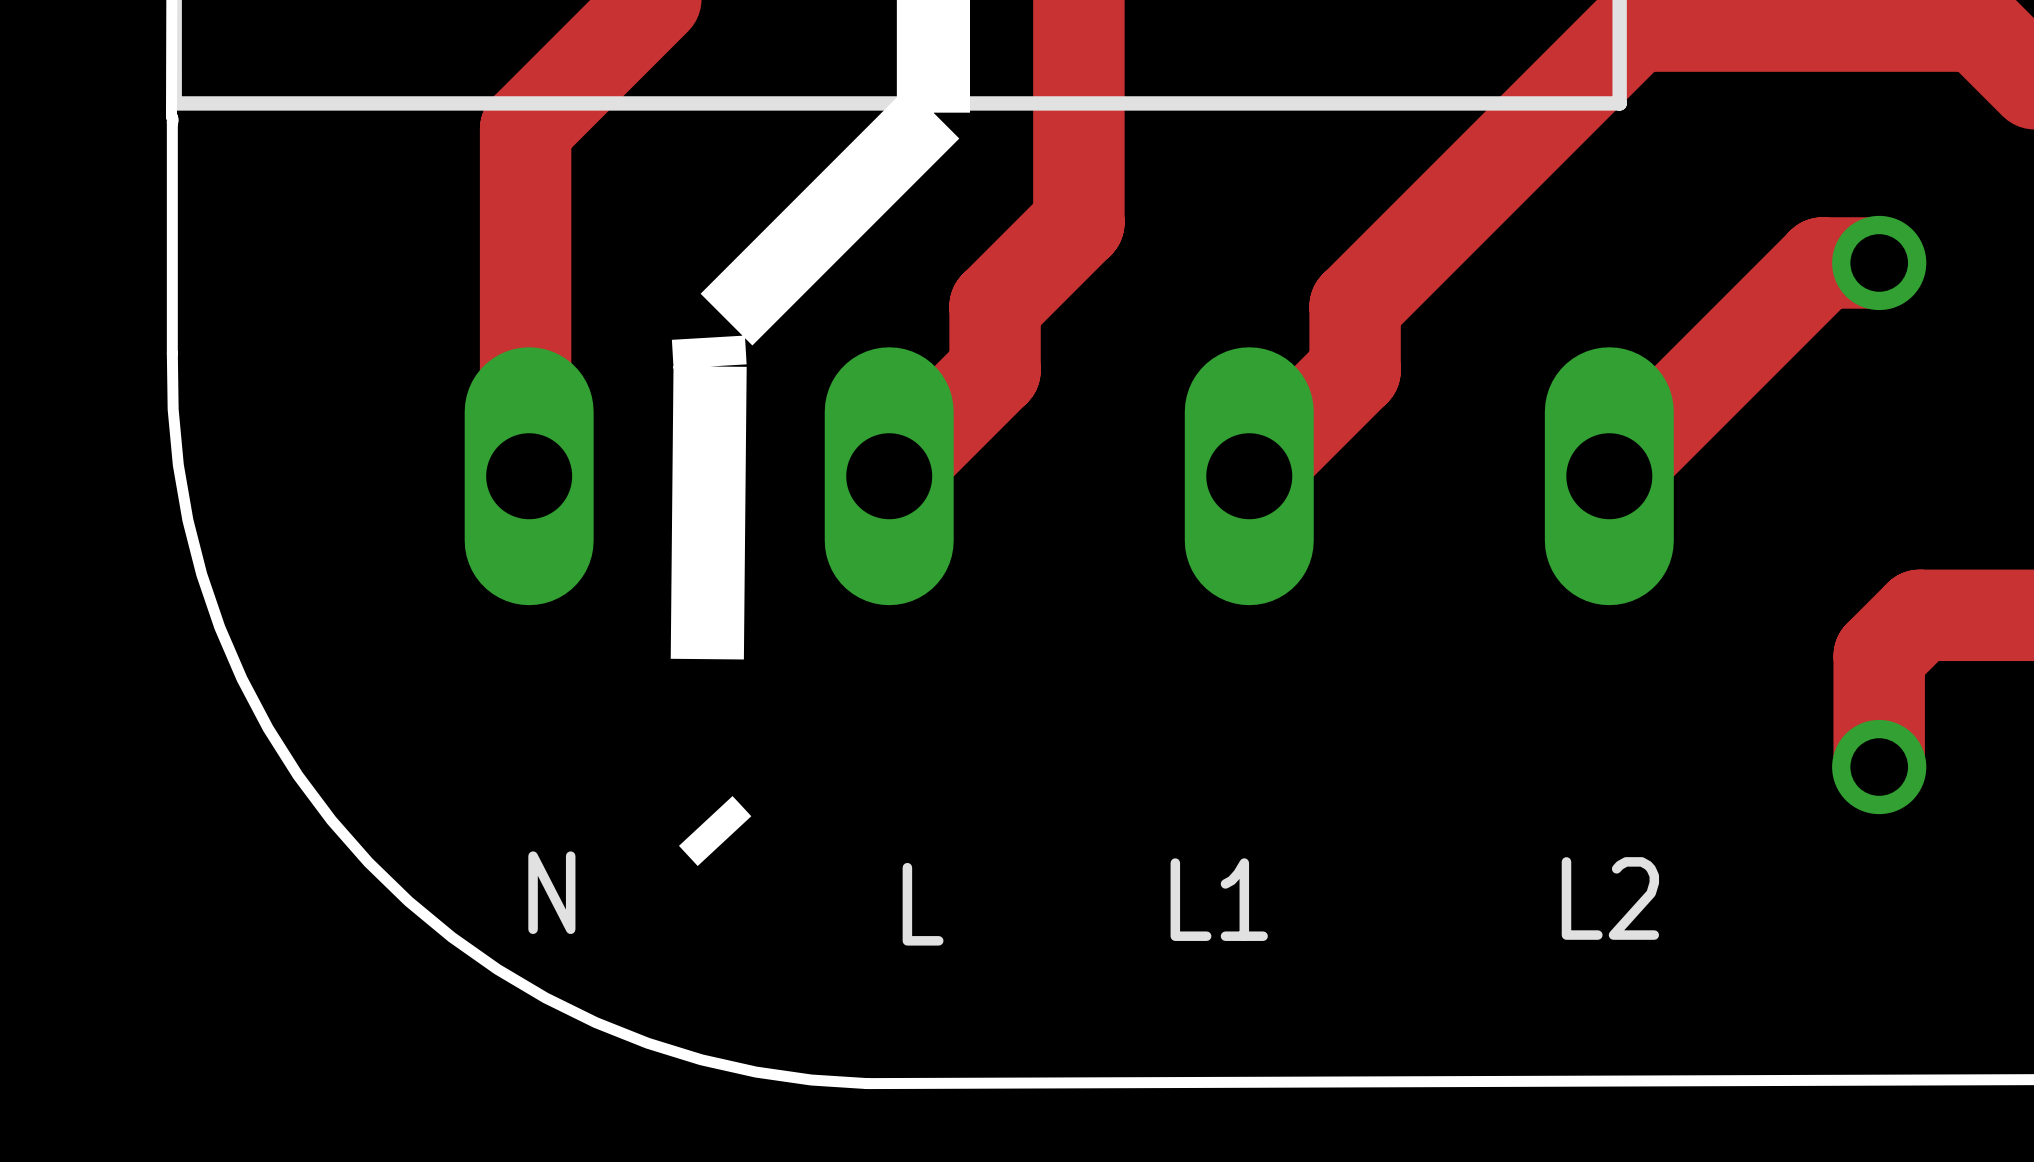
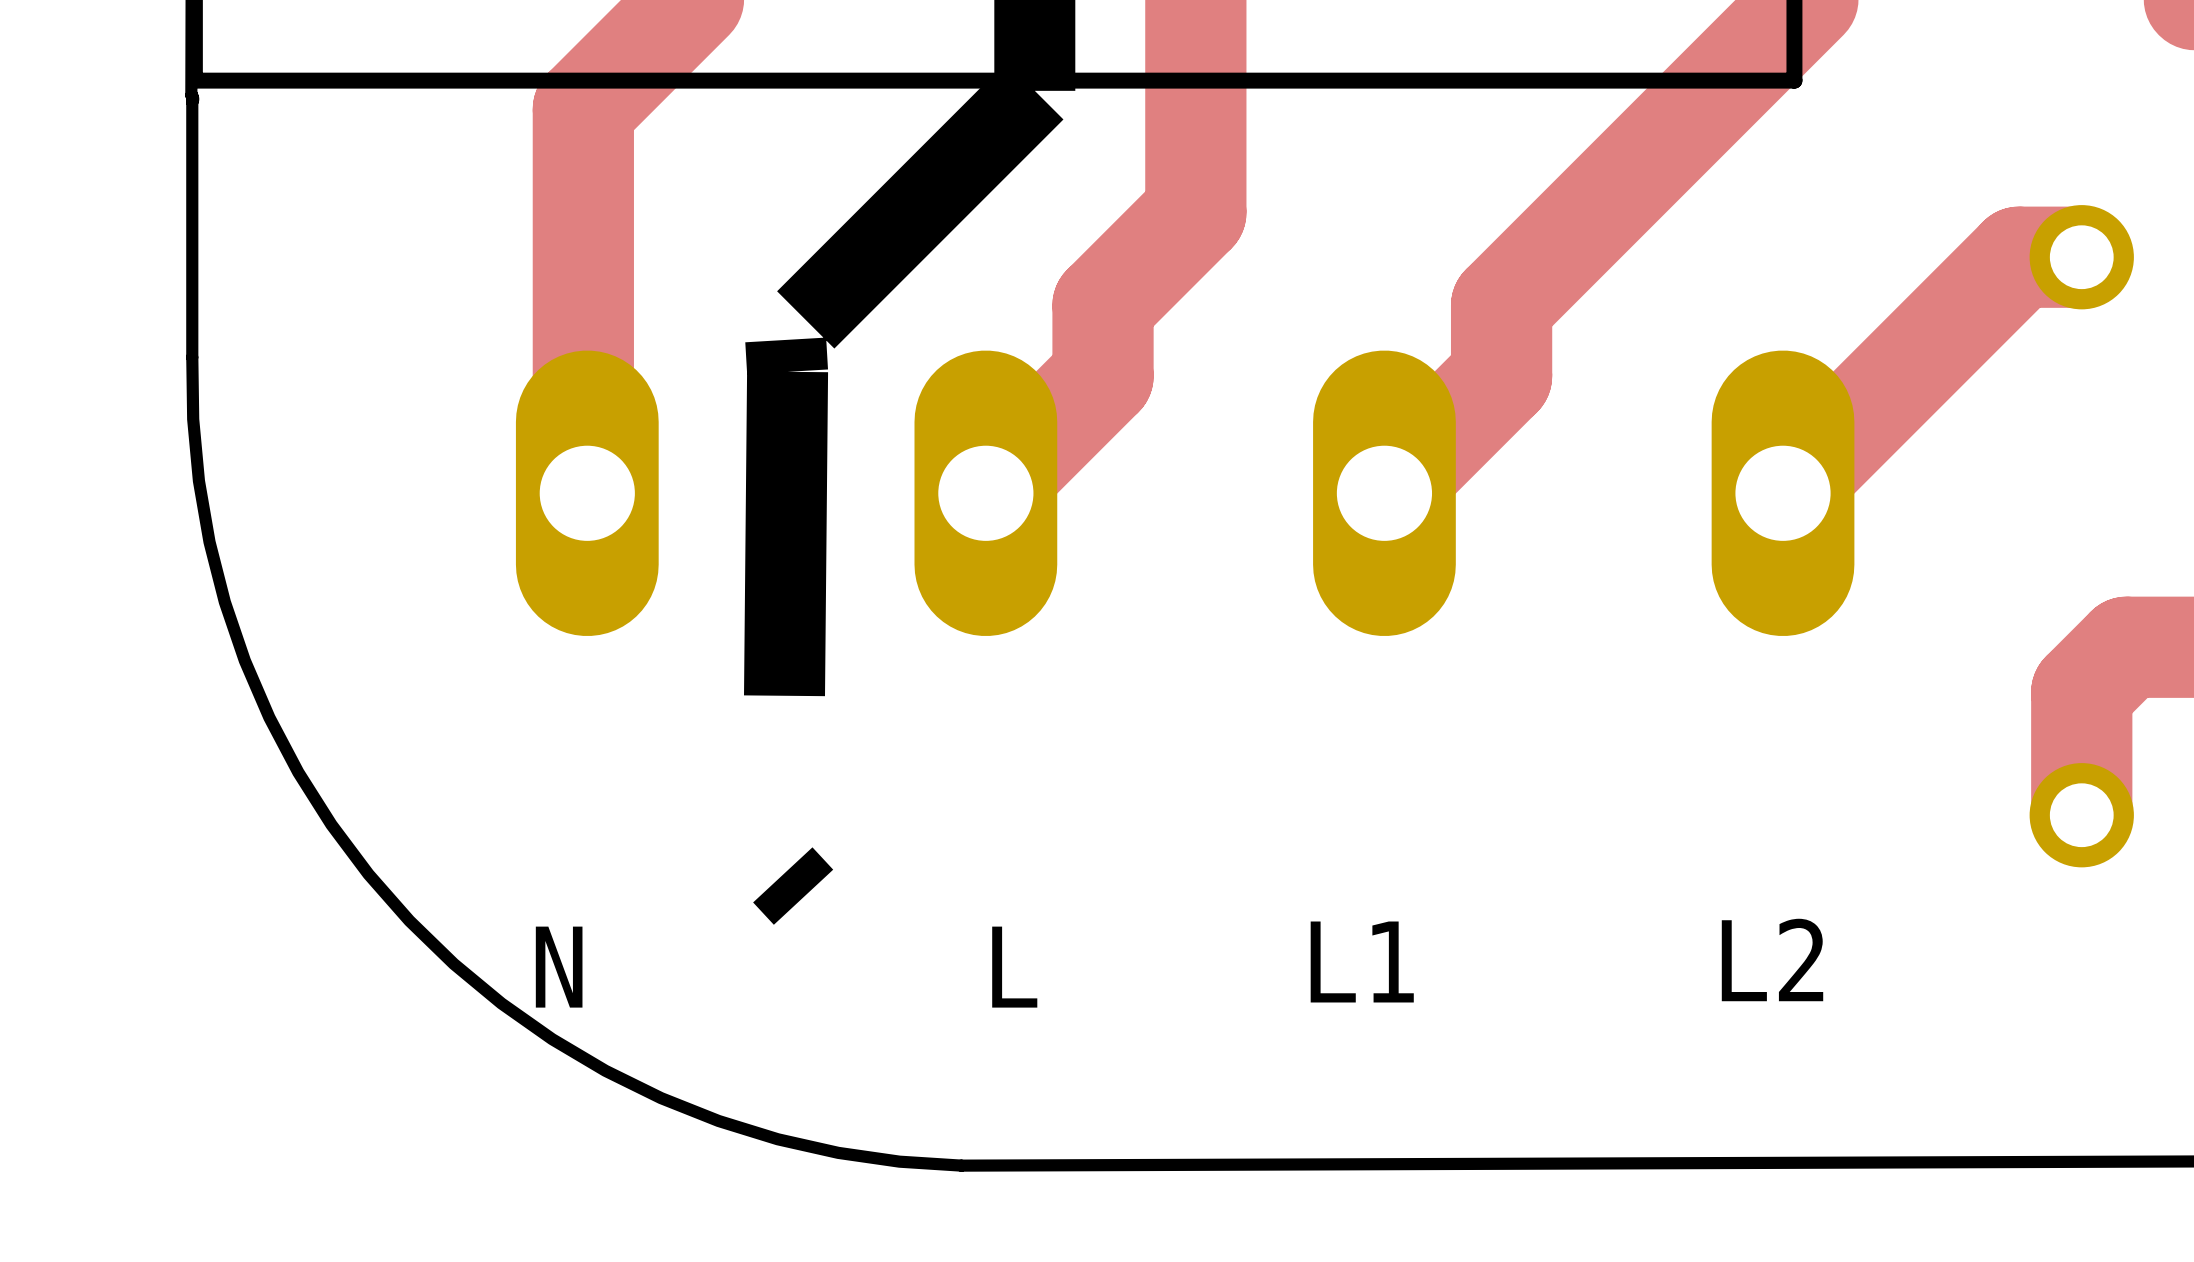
text position: N (551, 892) -> N (559, 967)

